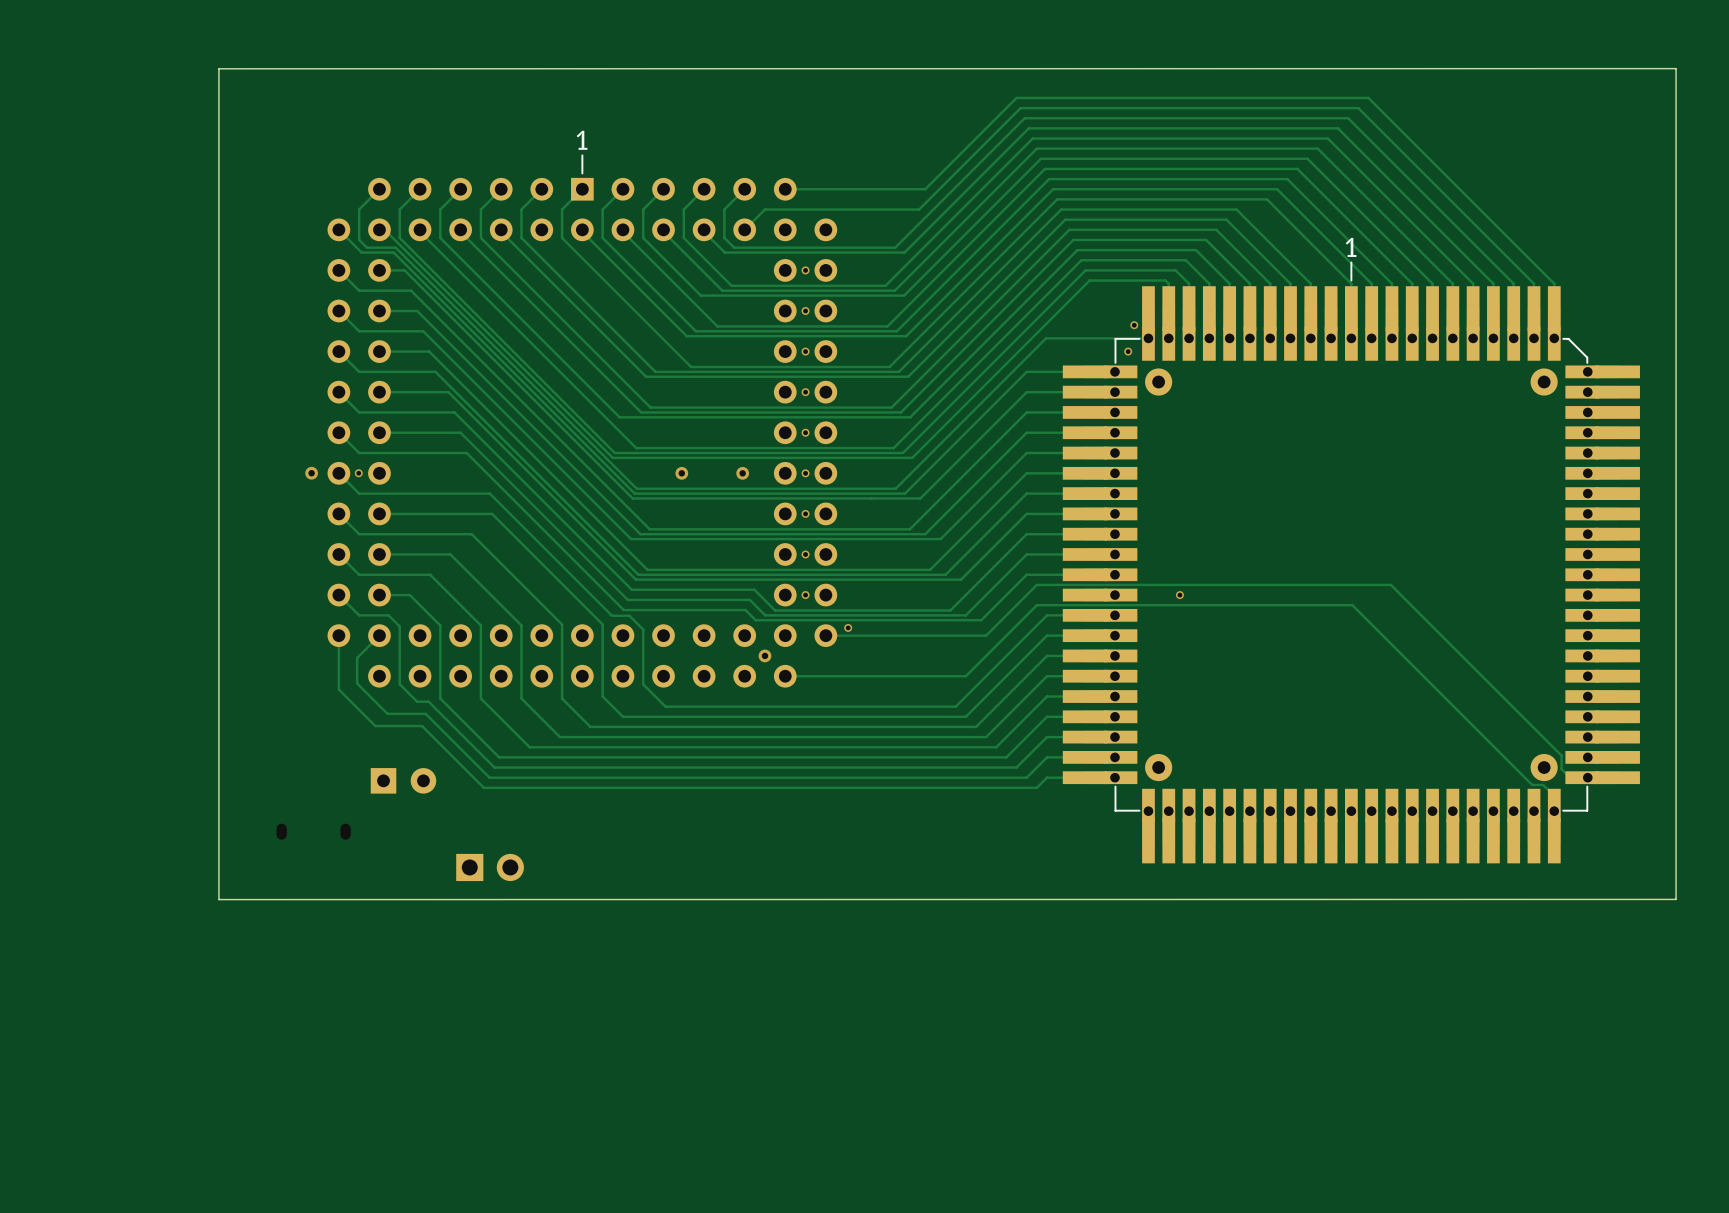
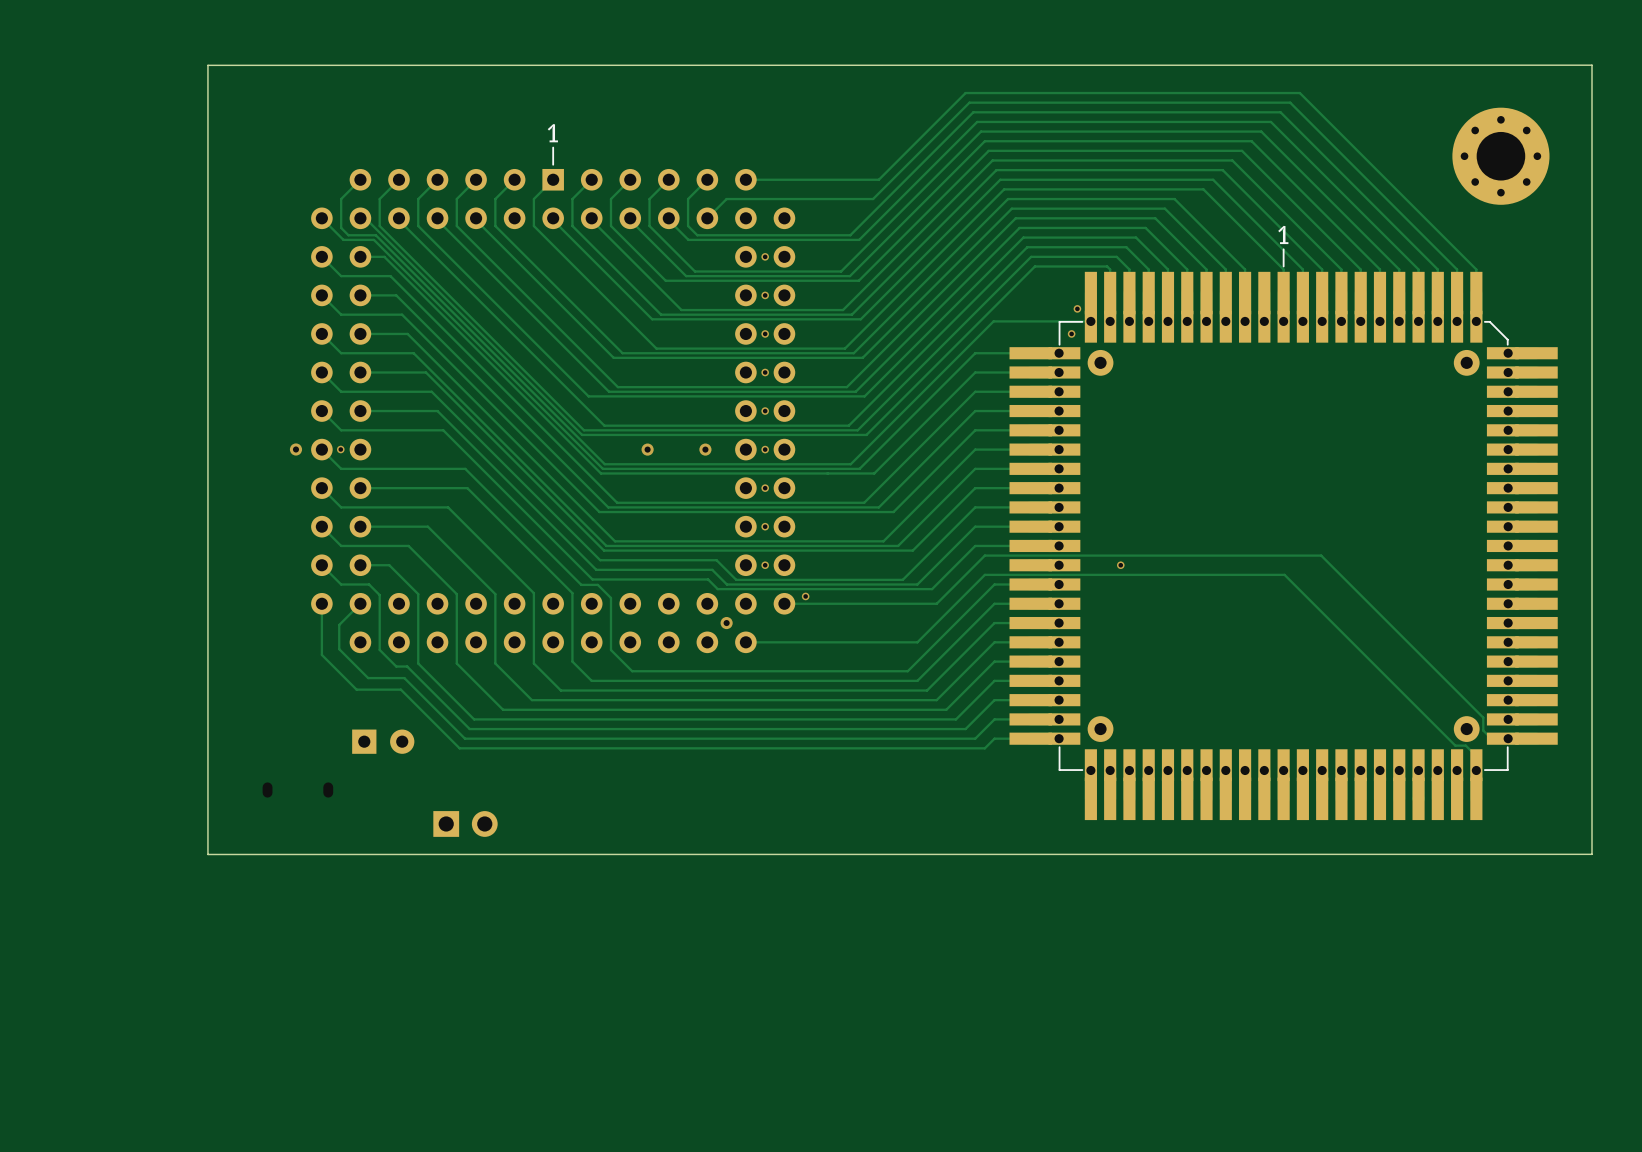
part: none -> (1500, 156)

